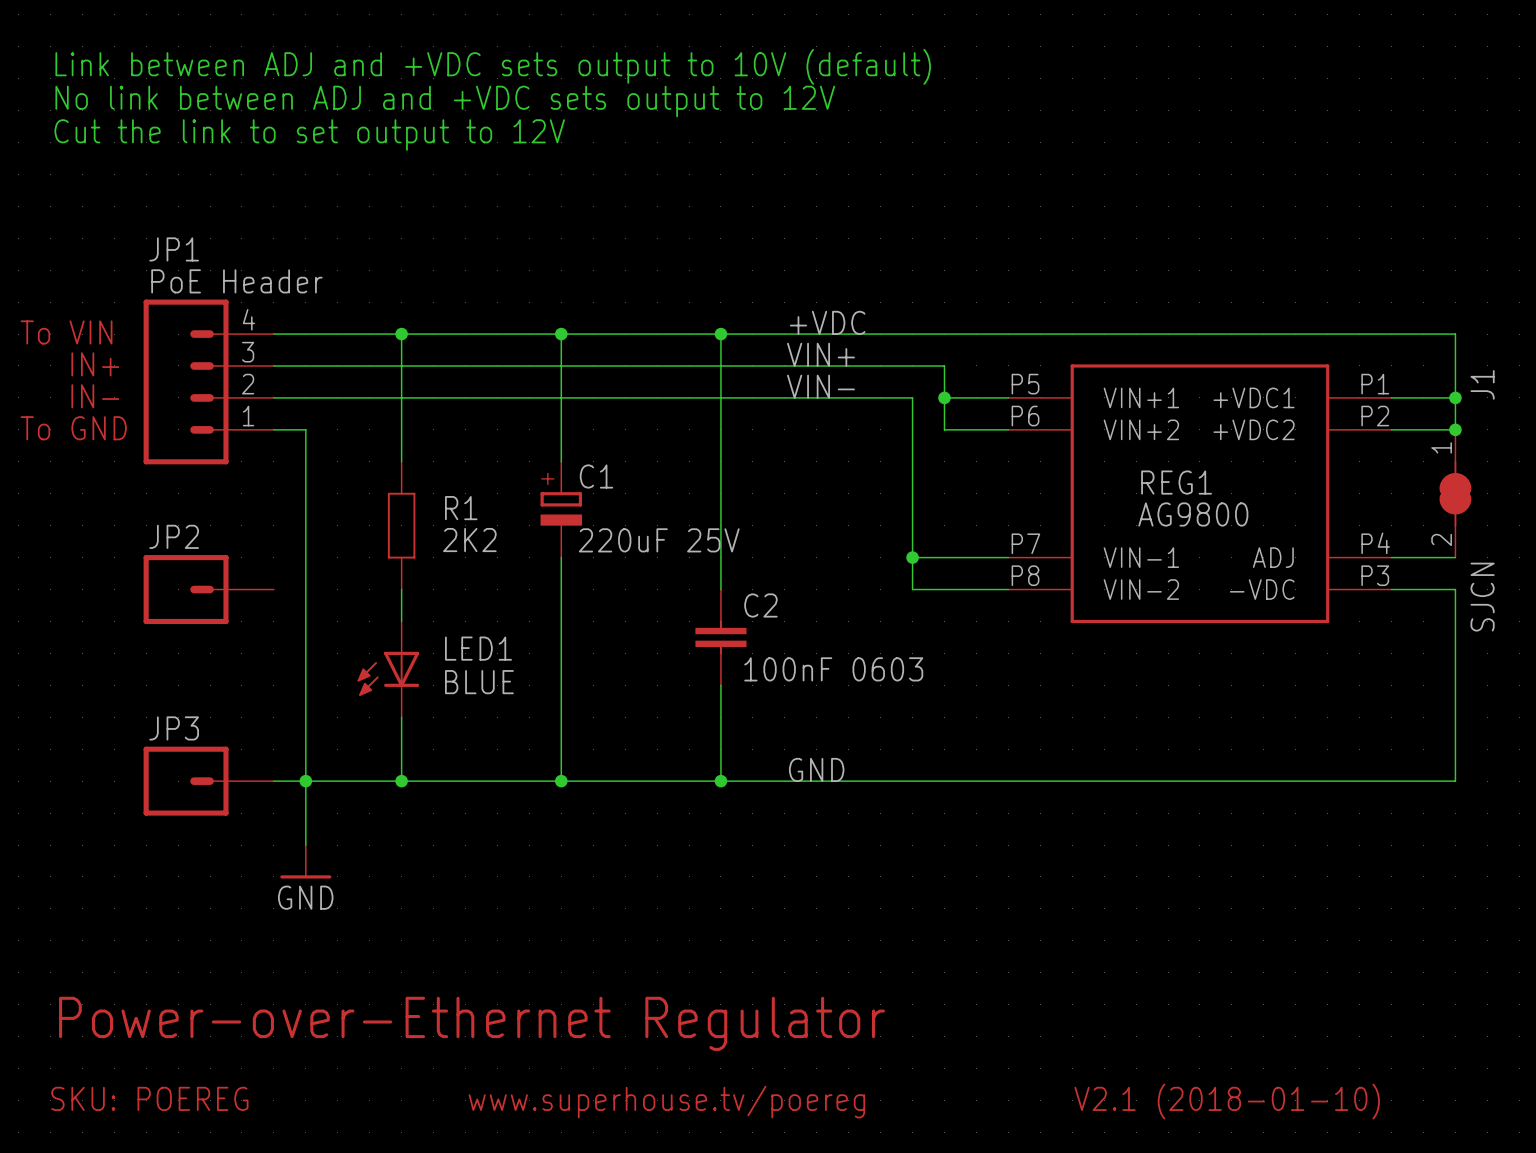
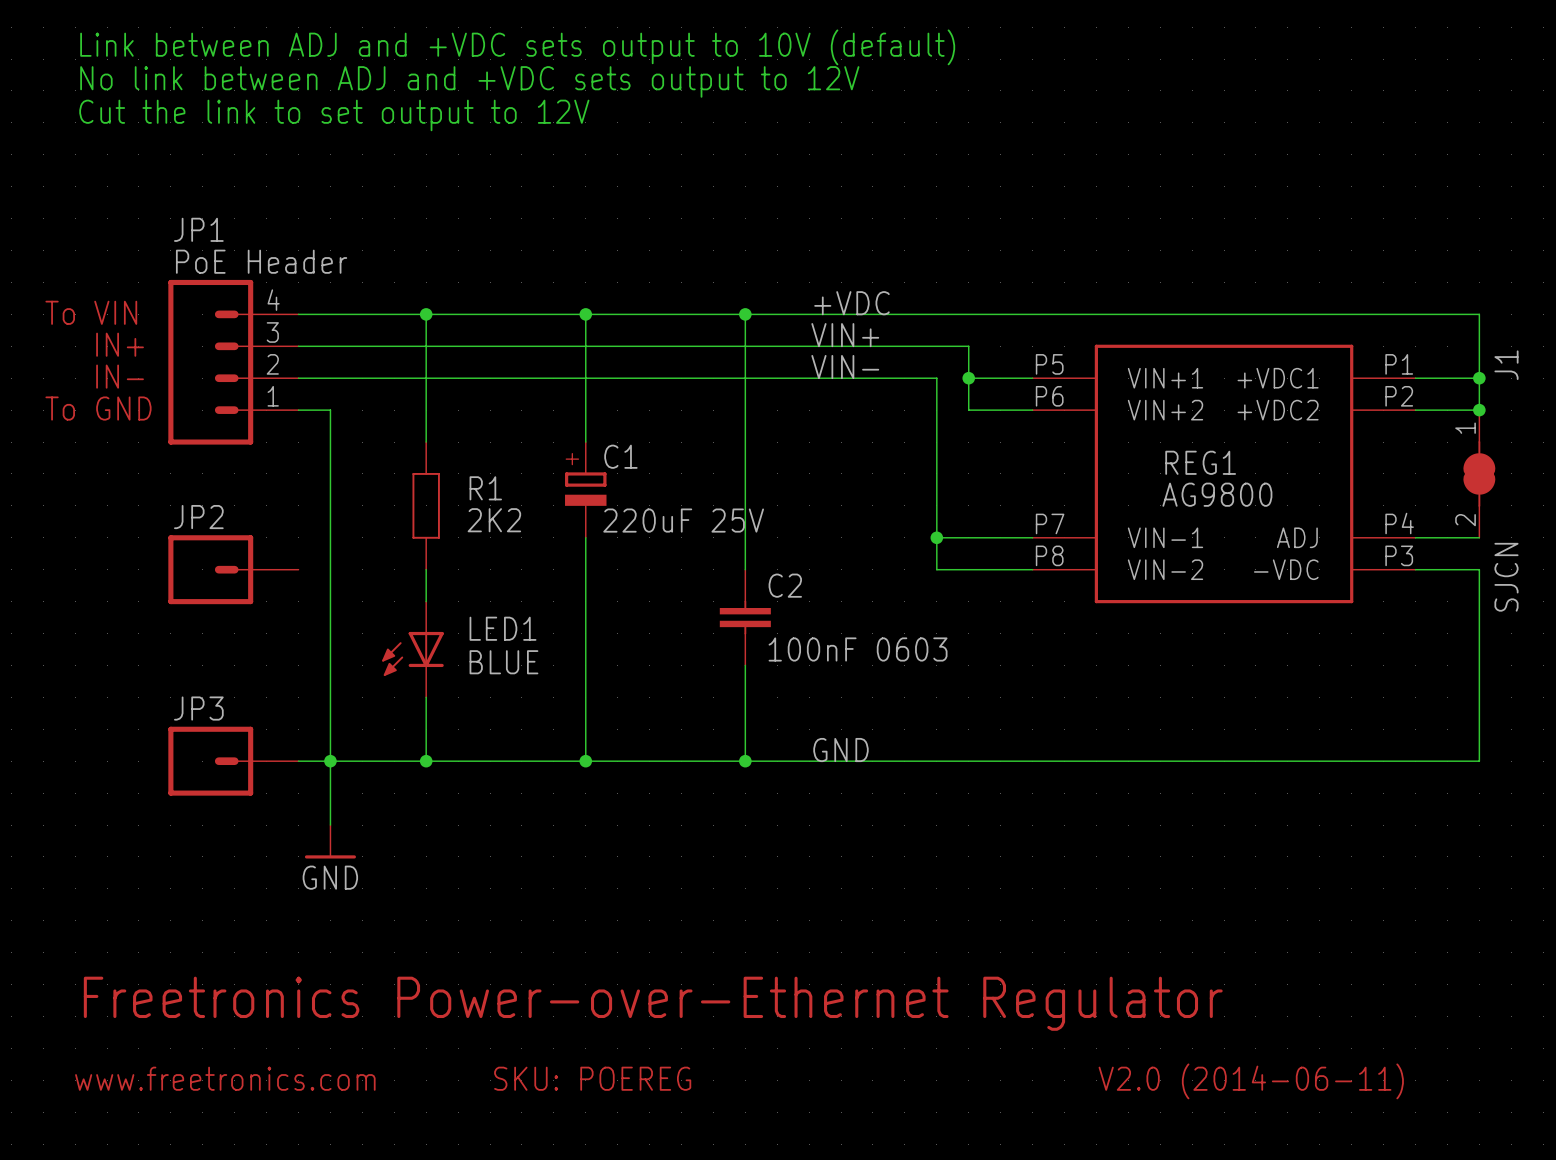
text: Power-over-Ethernet Regulator (471, 1023) -> Freetronics Power-over-Ethernet Regulator (653, 1003)
text: SKU: POEREG (149, 1098) -> www.freetronics.com (225, 1078)
text: V2.1 (2018-01-10) (1227, 1101) -> V2.0 (2014-06-11) (1251, 1081)
text: www.superhouse.tv/poereg (666, 1102) -> SKU: POEREG (592, 1078)

